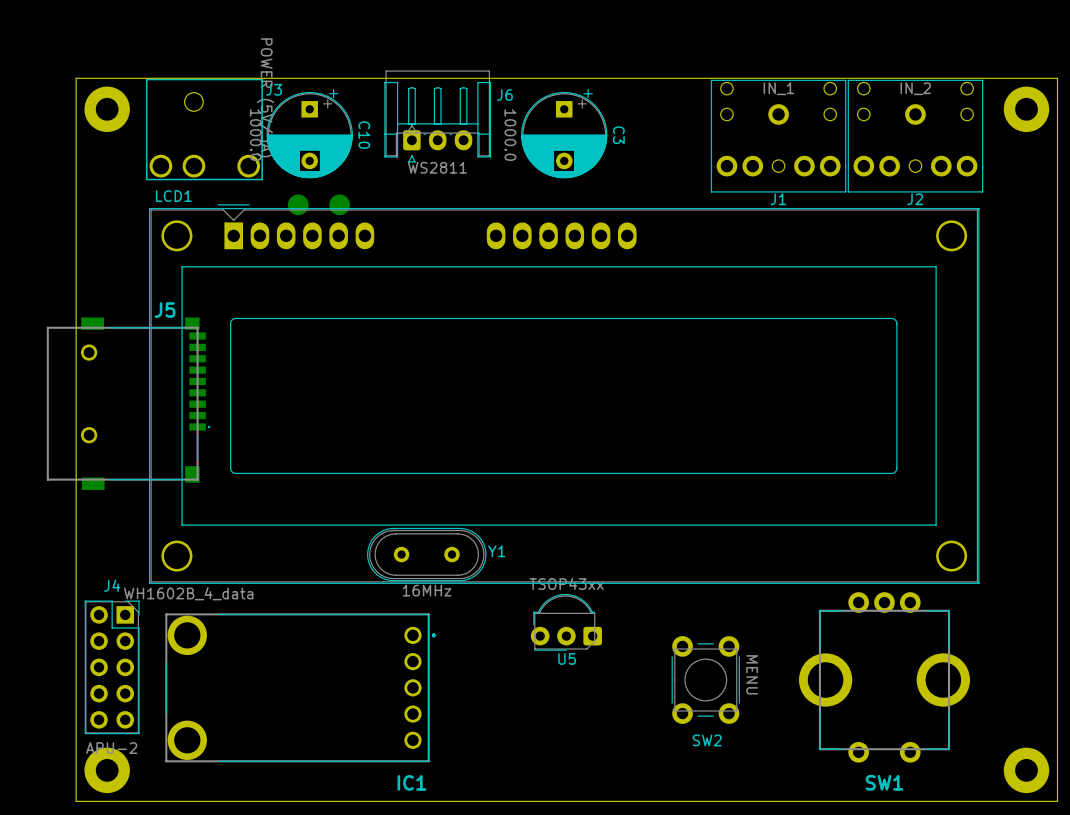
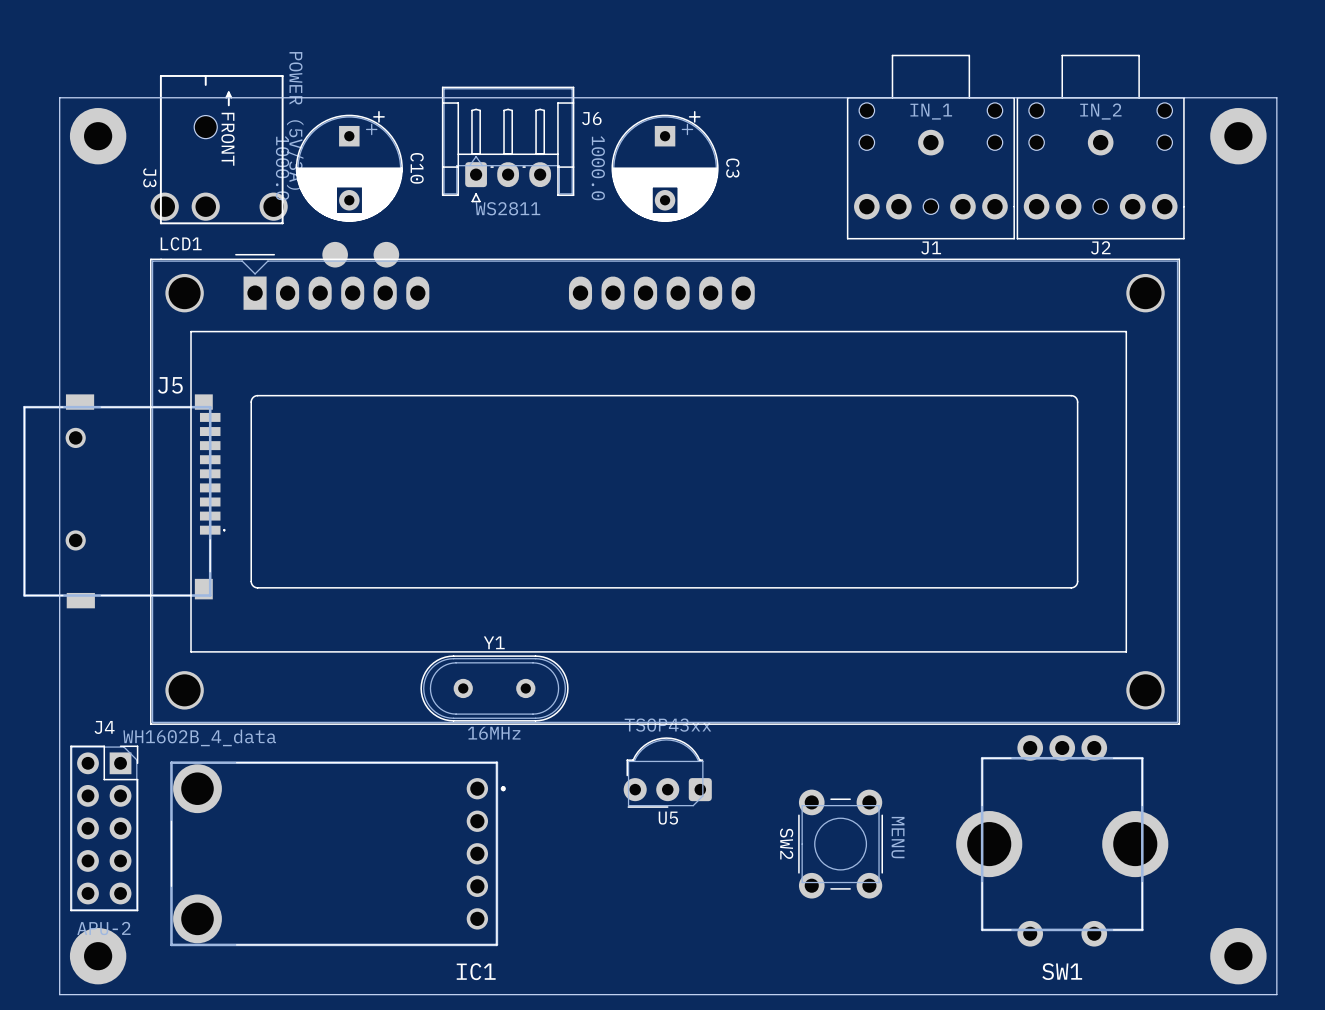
J6 footprint: [384, 70, 492, 163] -> [441, 86, 575, 203]
J3 footprint: [145, 78, 263, 181] -> [150, 75, 288, 225]
J1 footprint: [710, 79, 847, 193] -> [846, 54, 1015, 240]
J2 footprint: [847, 79, 984, 193] -> [1016, 54, 1185, 240]
J3 name position: J3 (274, 89) -> J3 (149, 177)
J5 footprint: [46, 317, 210, 490] -> [23, 394, 226, 609]
Y1 name position: Y1 (496, 551) -> Y1 (494, 642)
SW2 name rotation: 0° (707, 740) -> 90° clockwise (786, 843)
SW2 name position: SW2 (707, 740) -> SW2 (786, 843)

